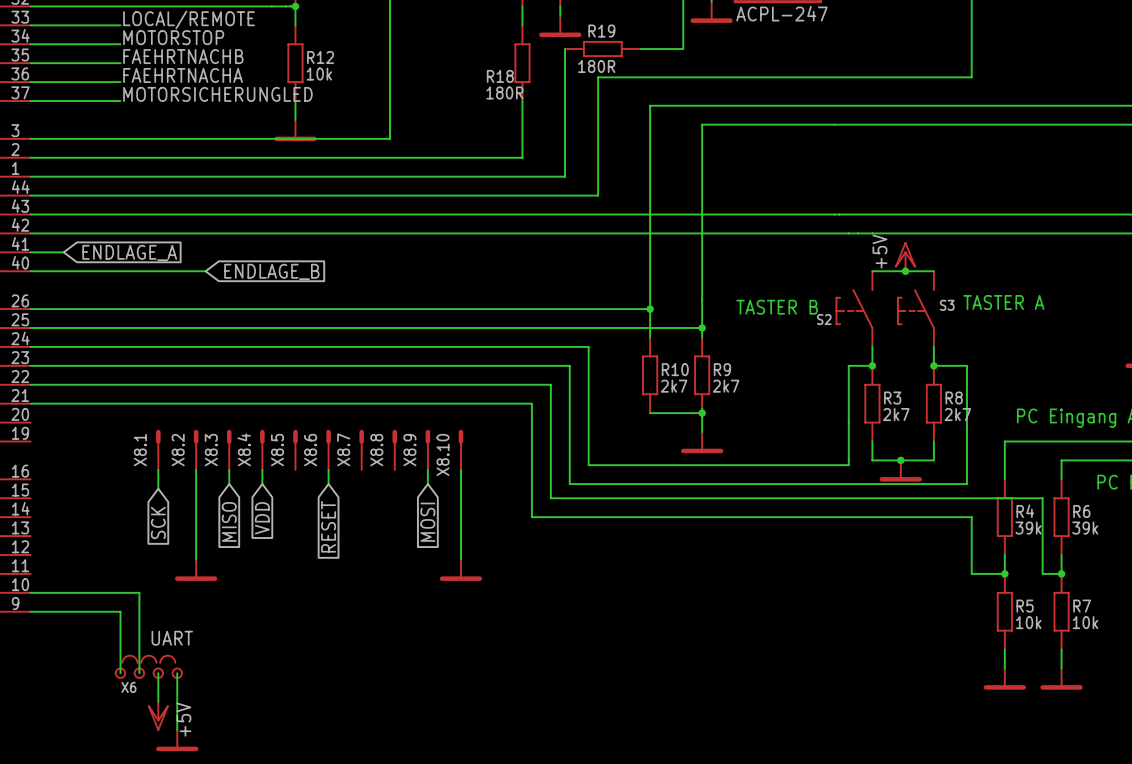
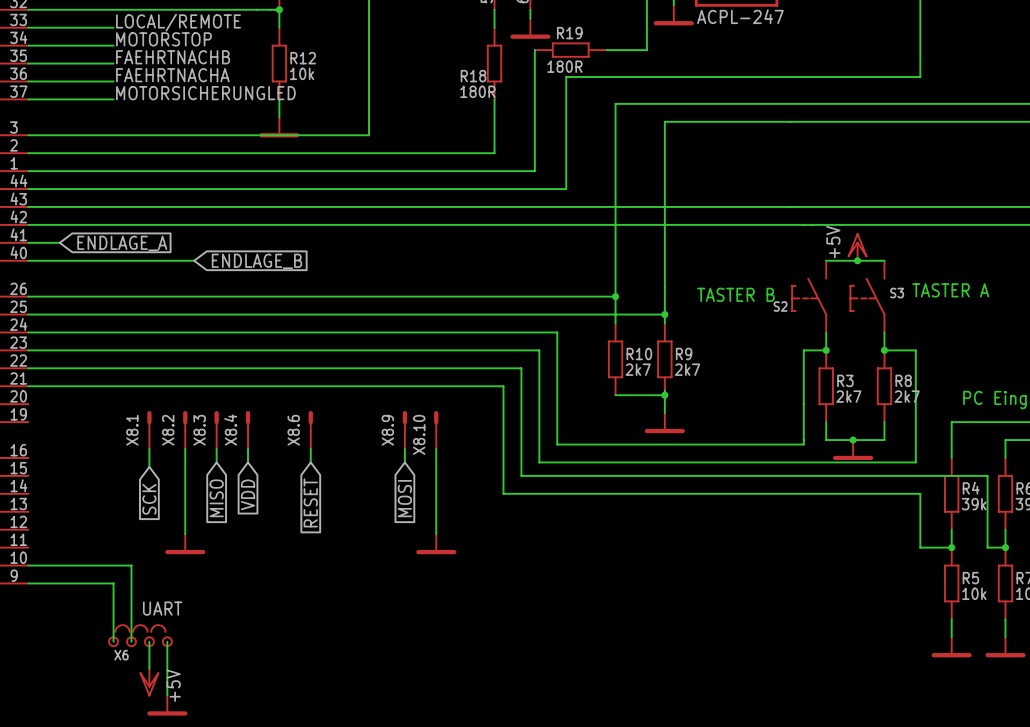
X8.5: (295, 449) -> none
X8.7: (361, 449) -> none
X8.8: (394, 449) -> none

